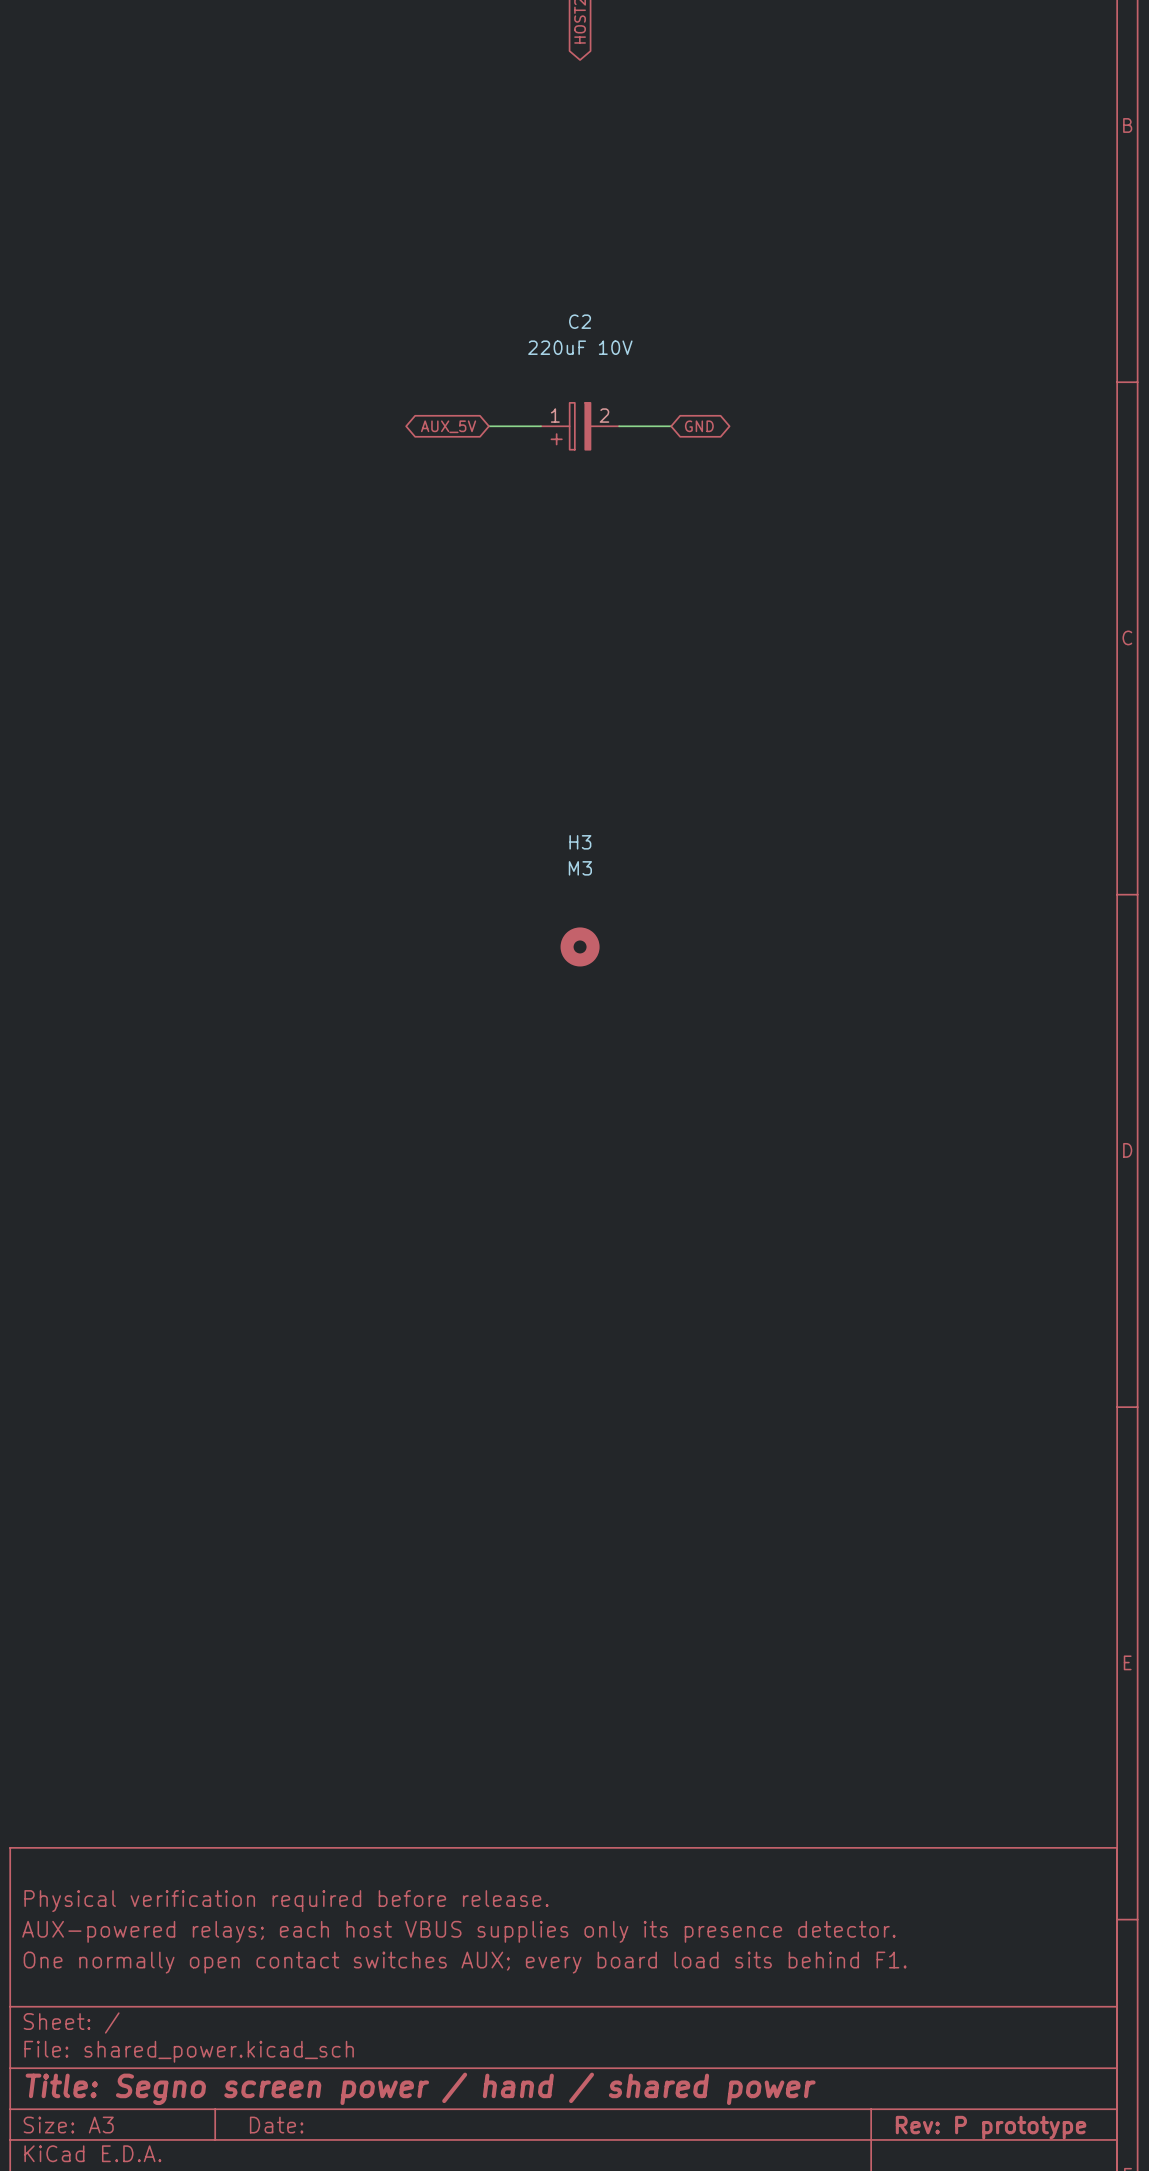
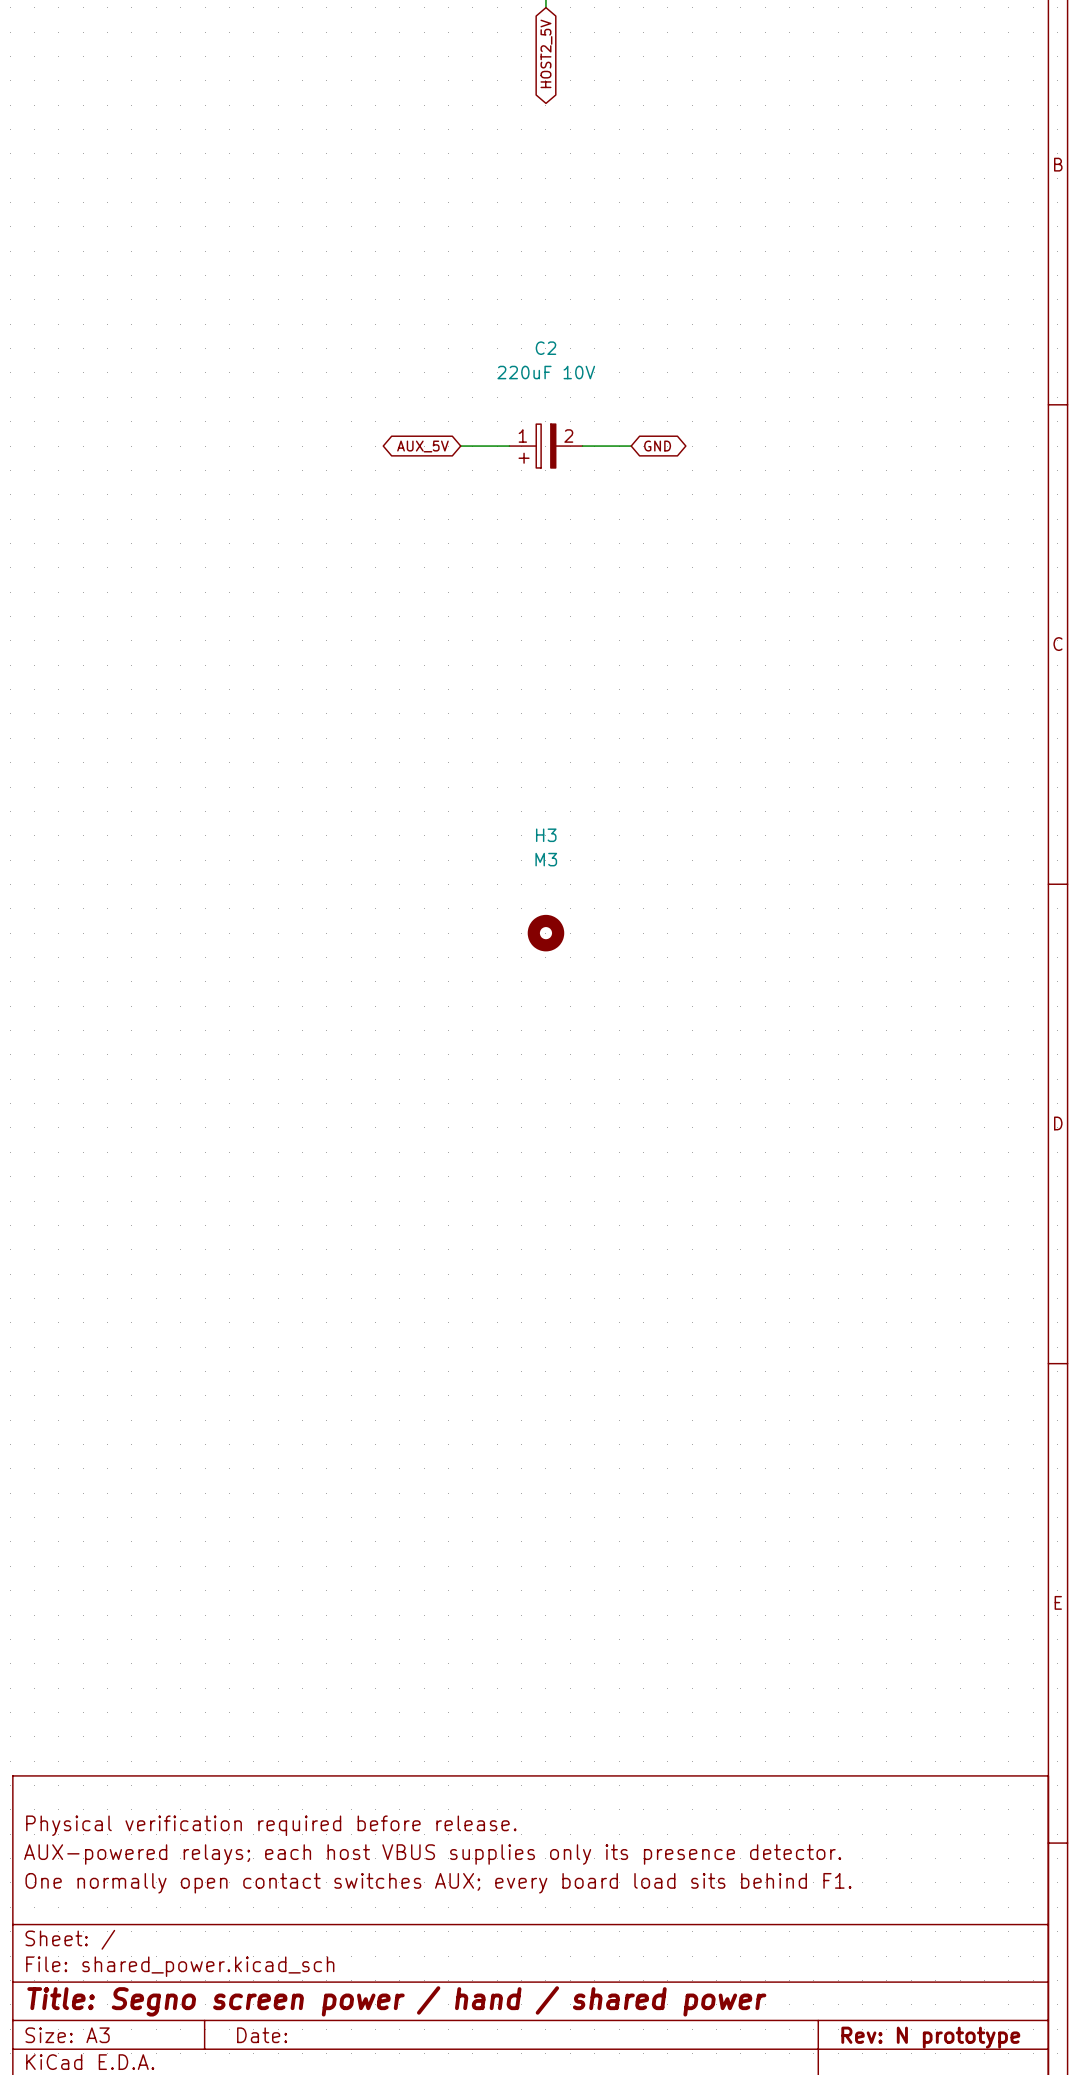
title block: Rev: P prototype (991, 2127) -> Rev: N prototype (930, 2037)

